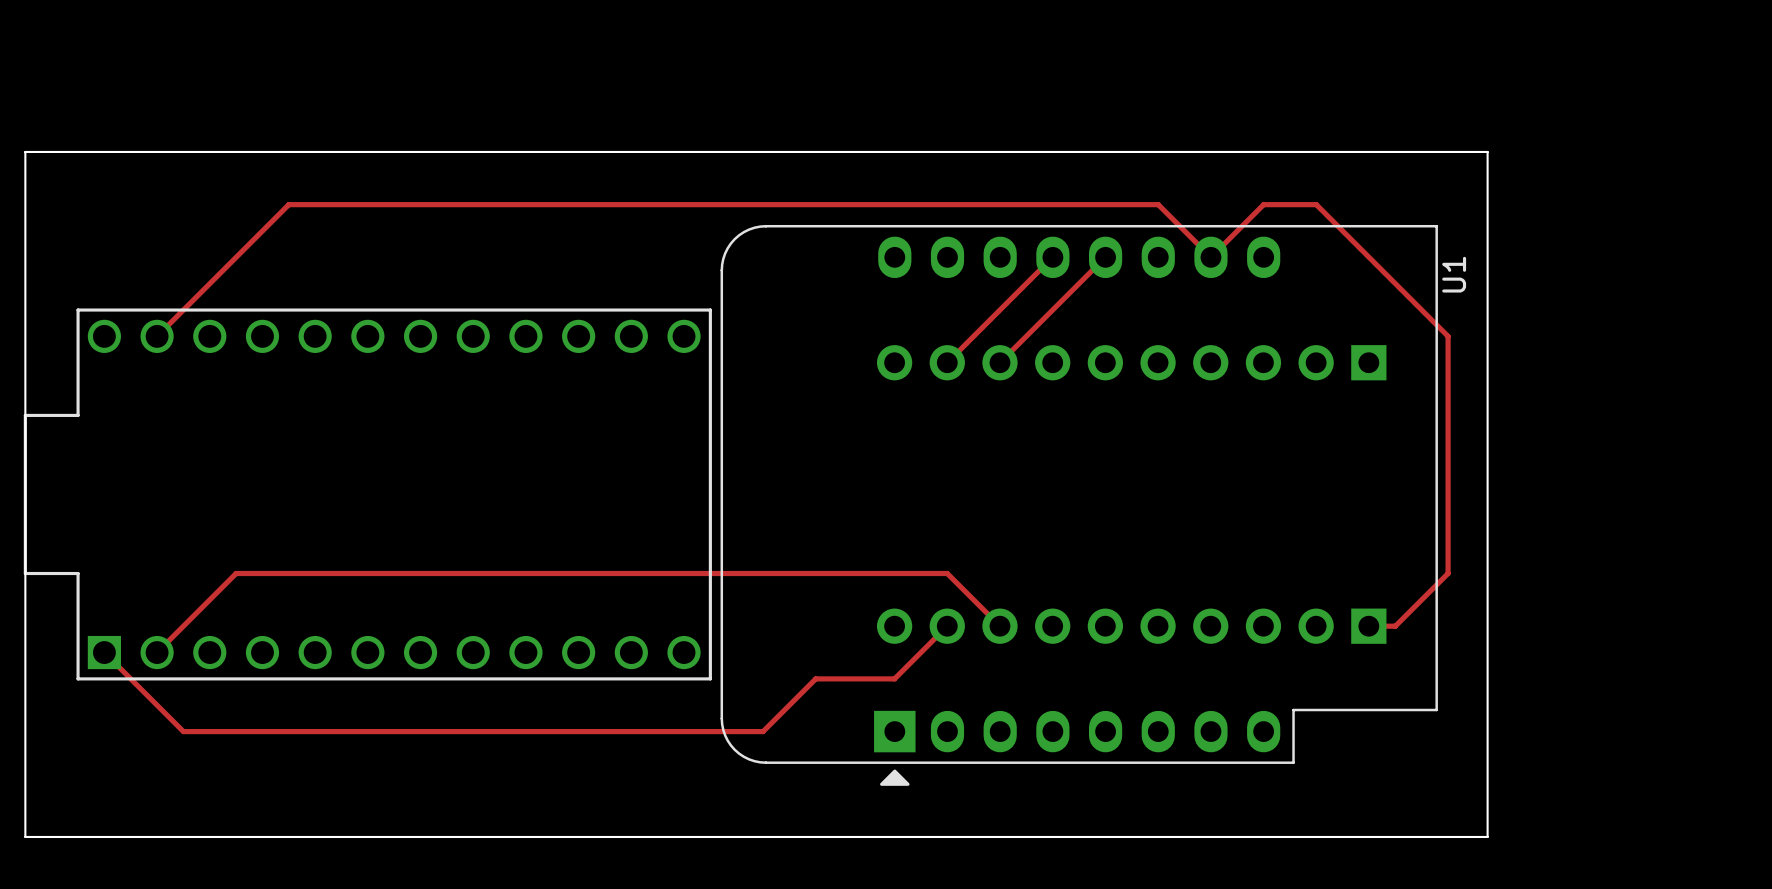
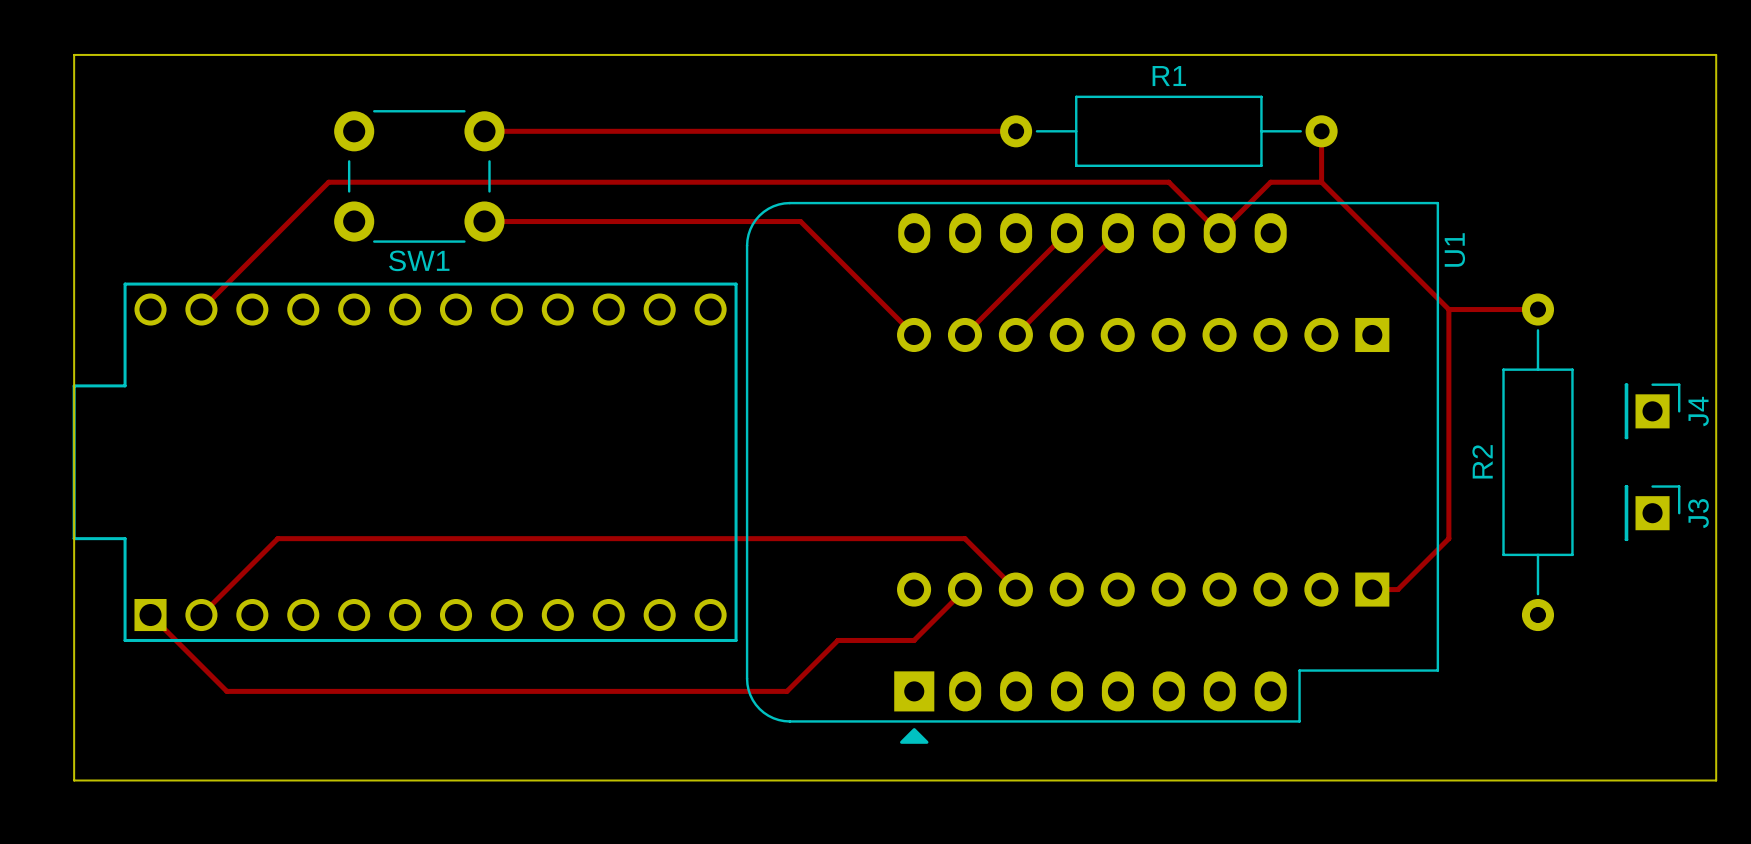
board edge: (25, 151) (1487, 151) (1487, 836) (25, 836) (25, 823) -> (74, 131) (74, 54) (1716, 54) (1716, 780) (74, 780)
track: none -> (484, 131) (1016, 131)
R1: none -> (1168, 131)
track: none -> (1321, 131) (1321, 182)
SW1: none -> (419, 176)
track: none -> (484, 221) (800, 221) (914, 334)
track: none -> (1448, 309) (1537, 309)
J4: none -> (1652, 411)
R2: none -> (1537, 462)
J3: none -> (1652, 513)

